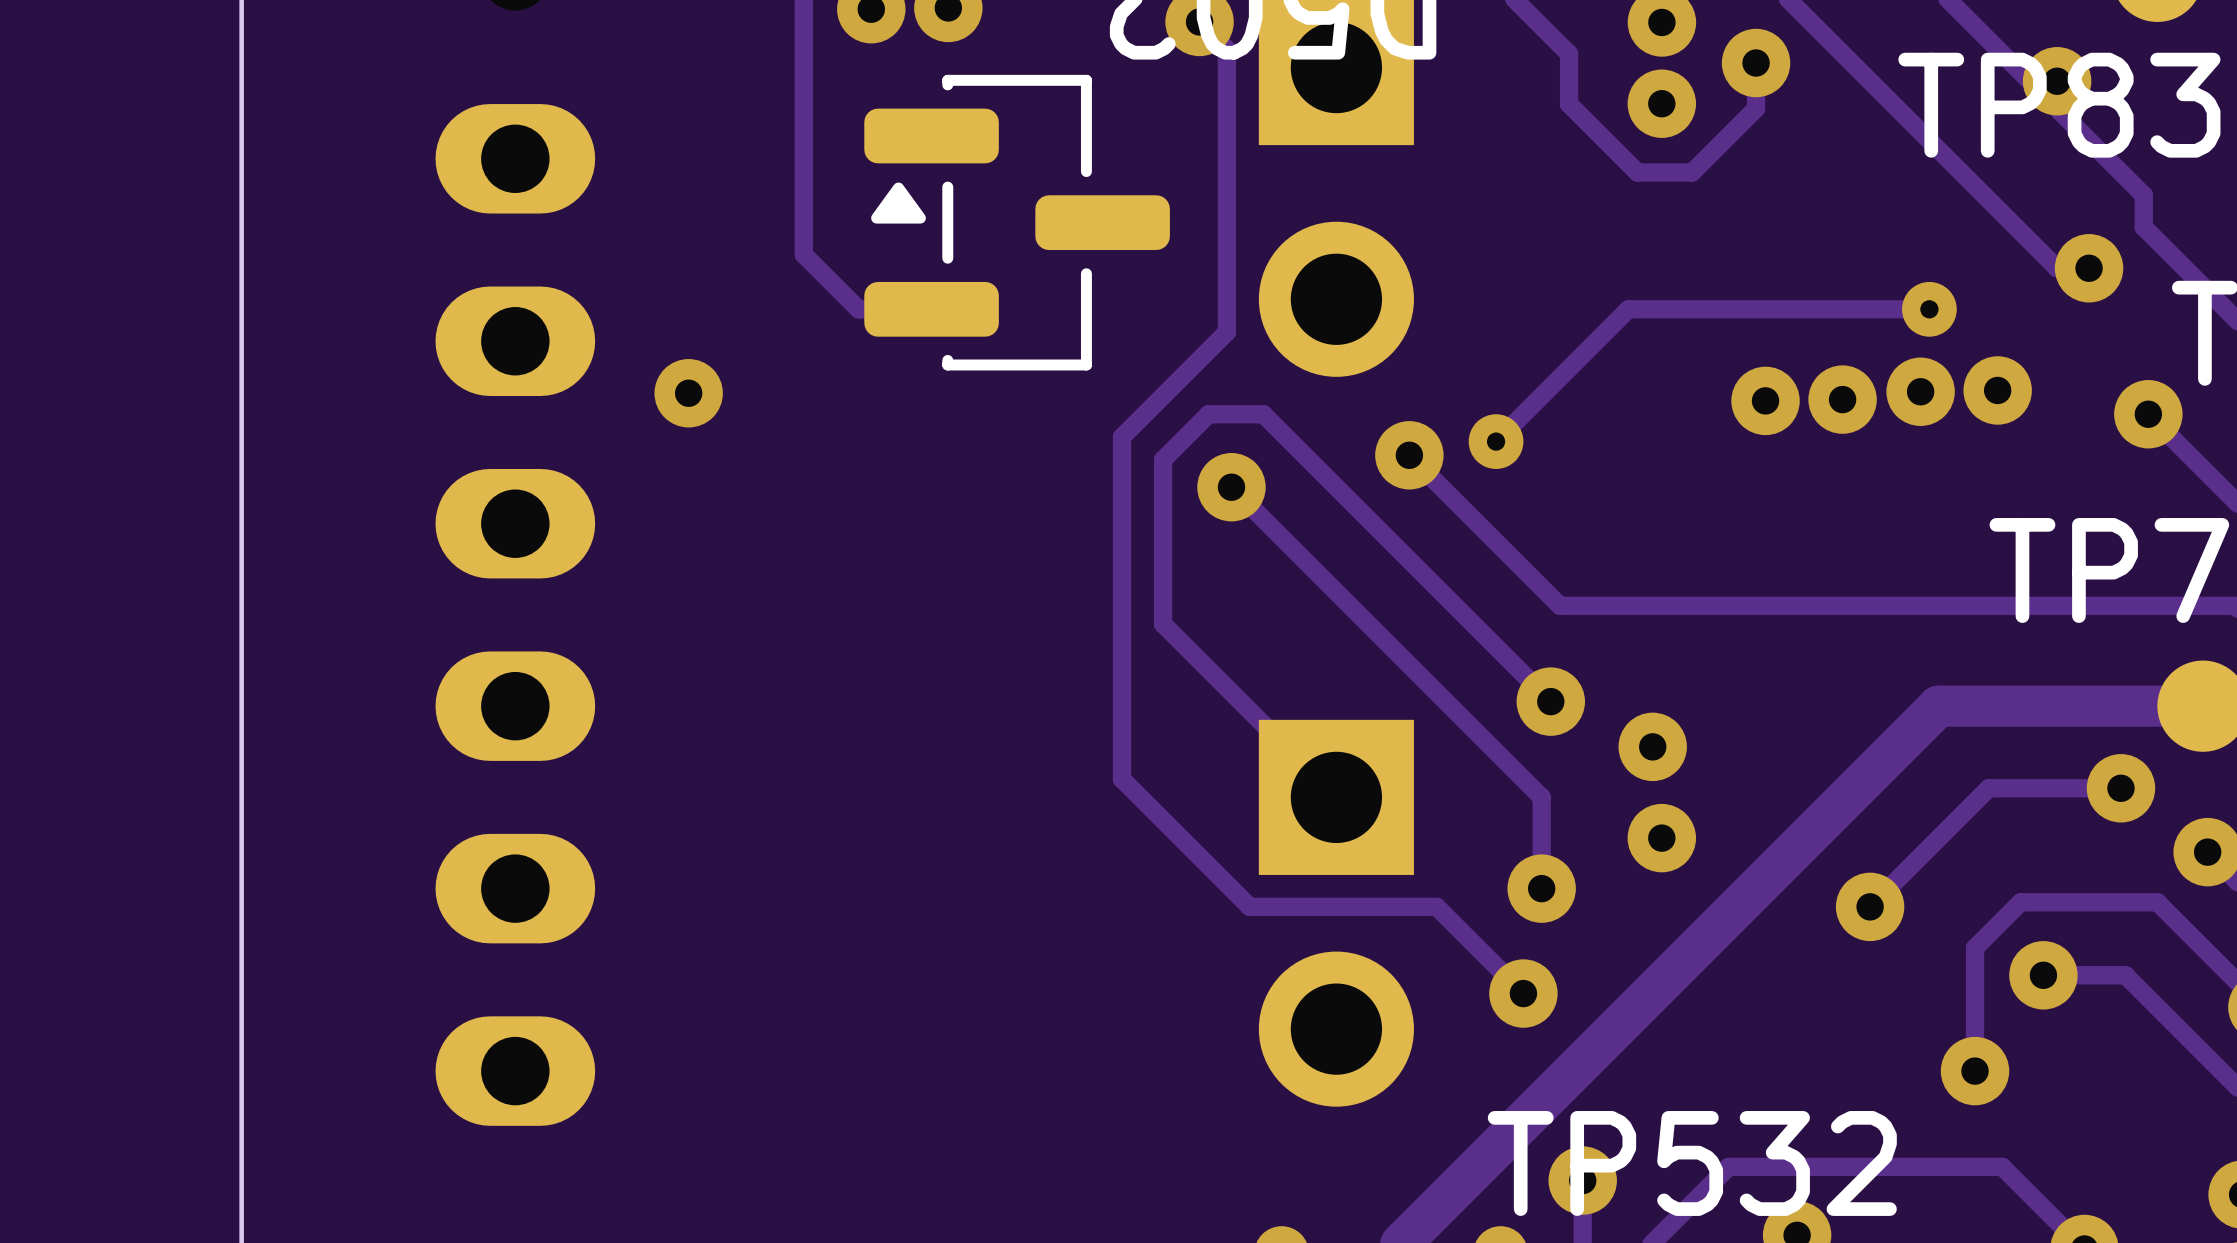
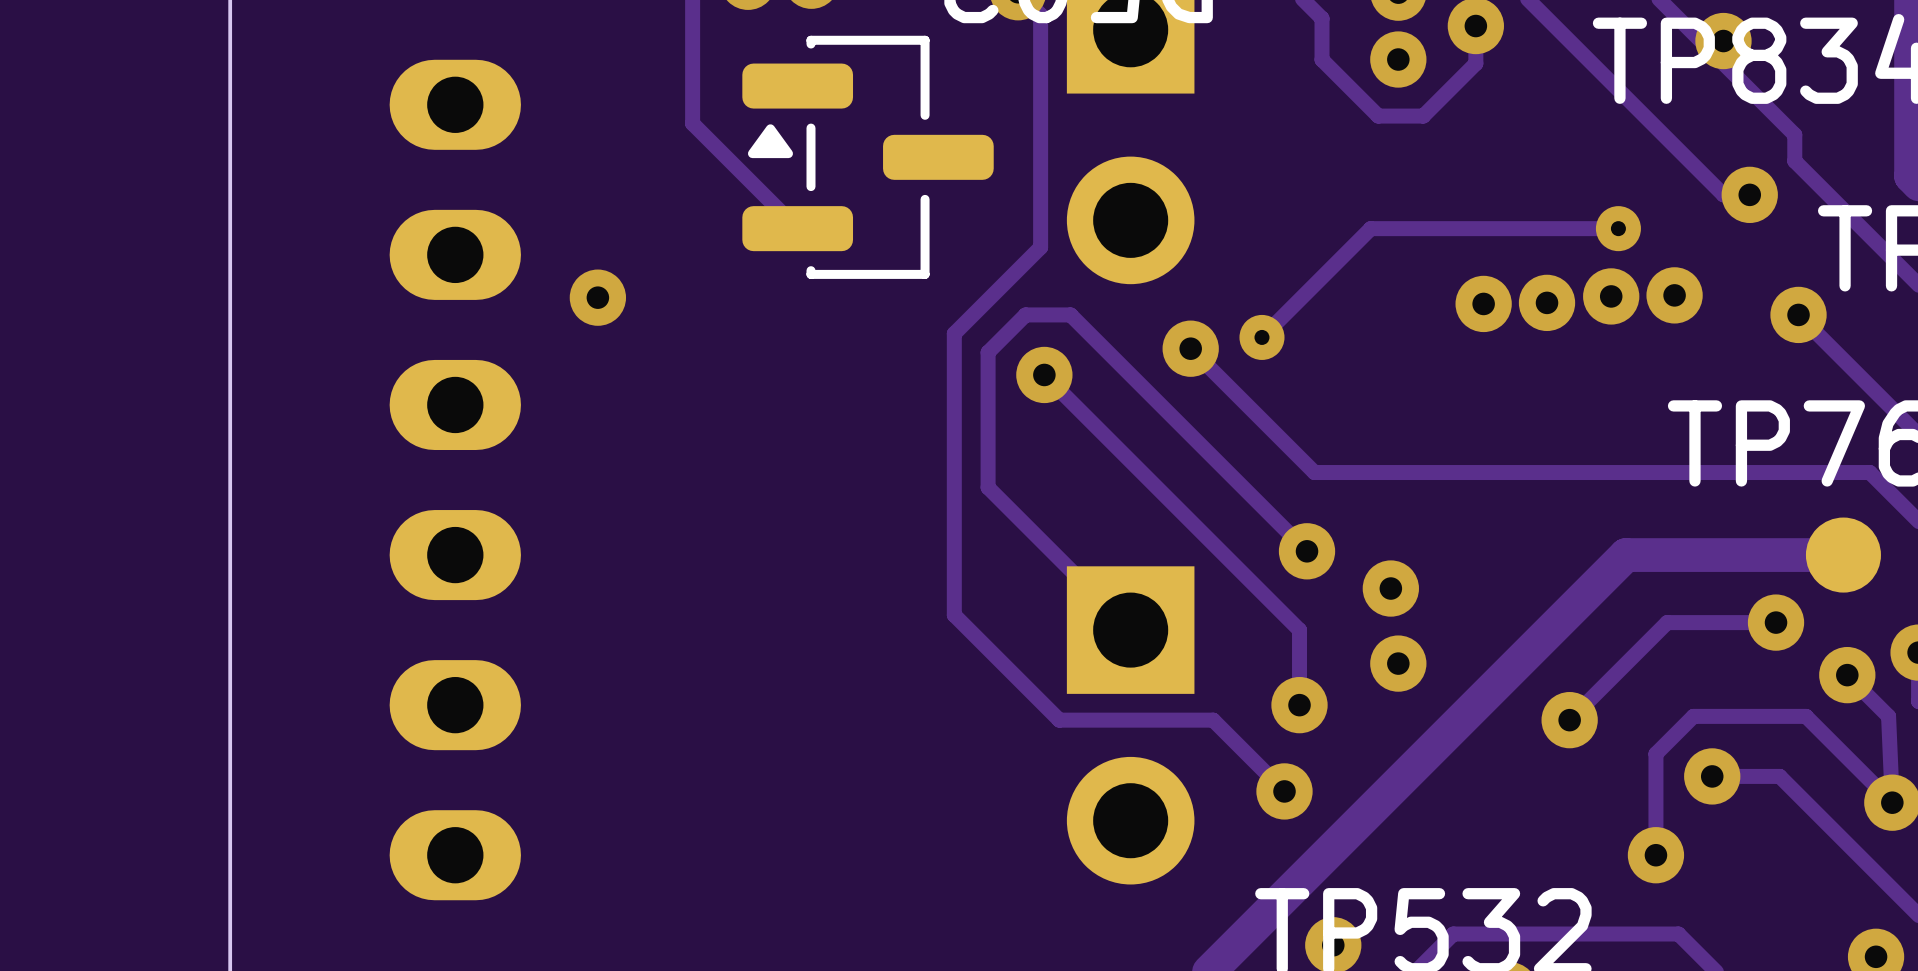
track: (803, 181) (803, 254) (858, 309) (931, 309) -> (692, 123) (797, 228)

